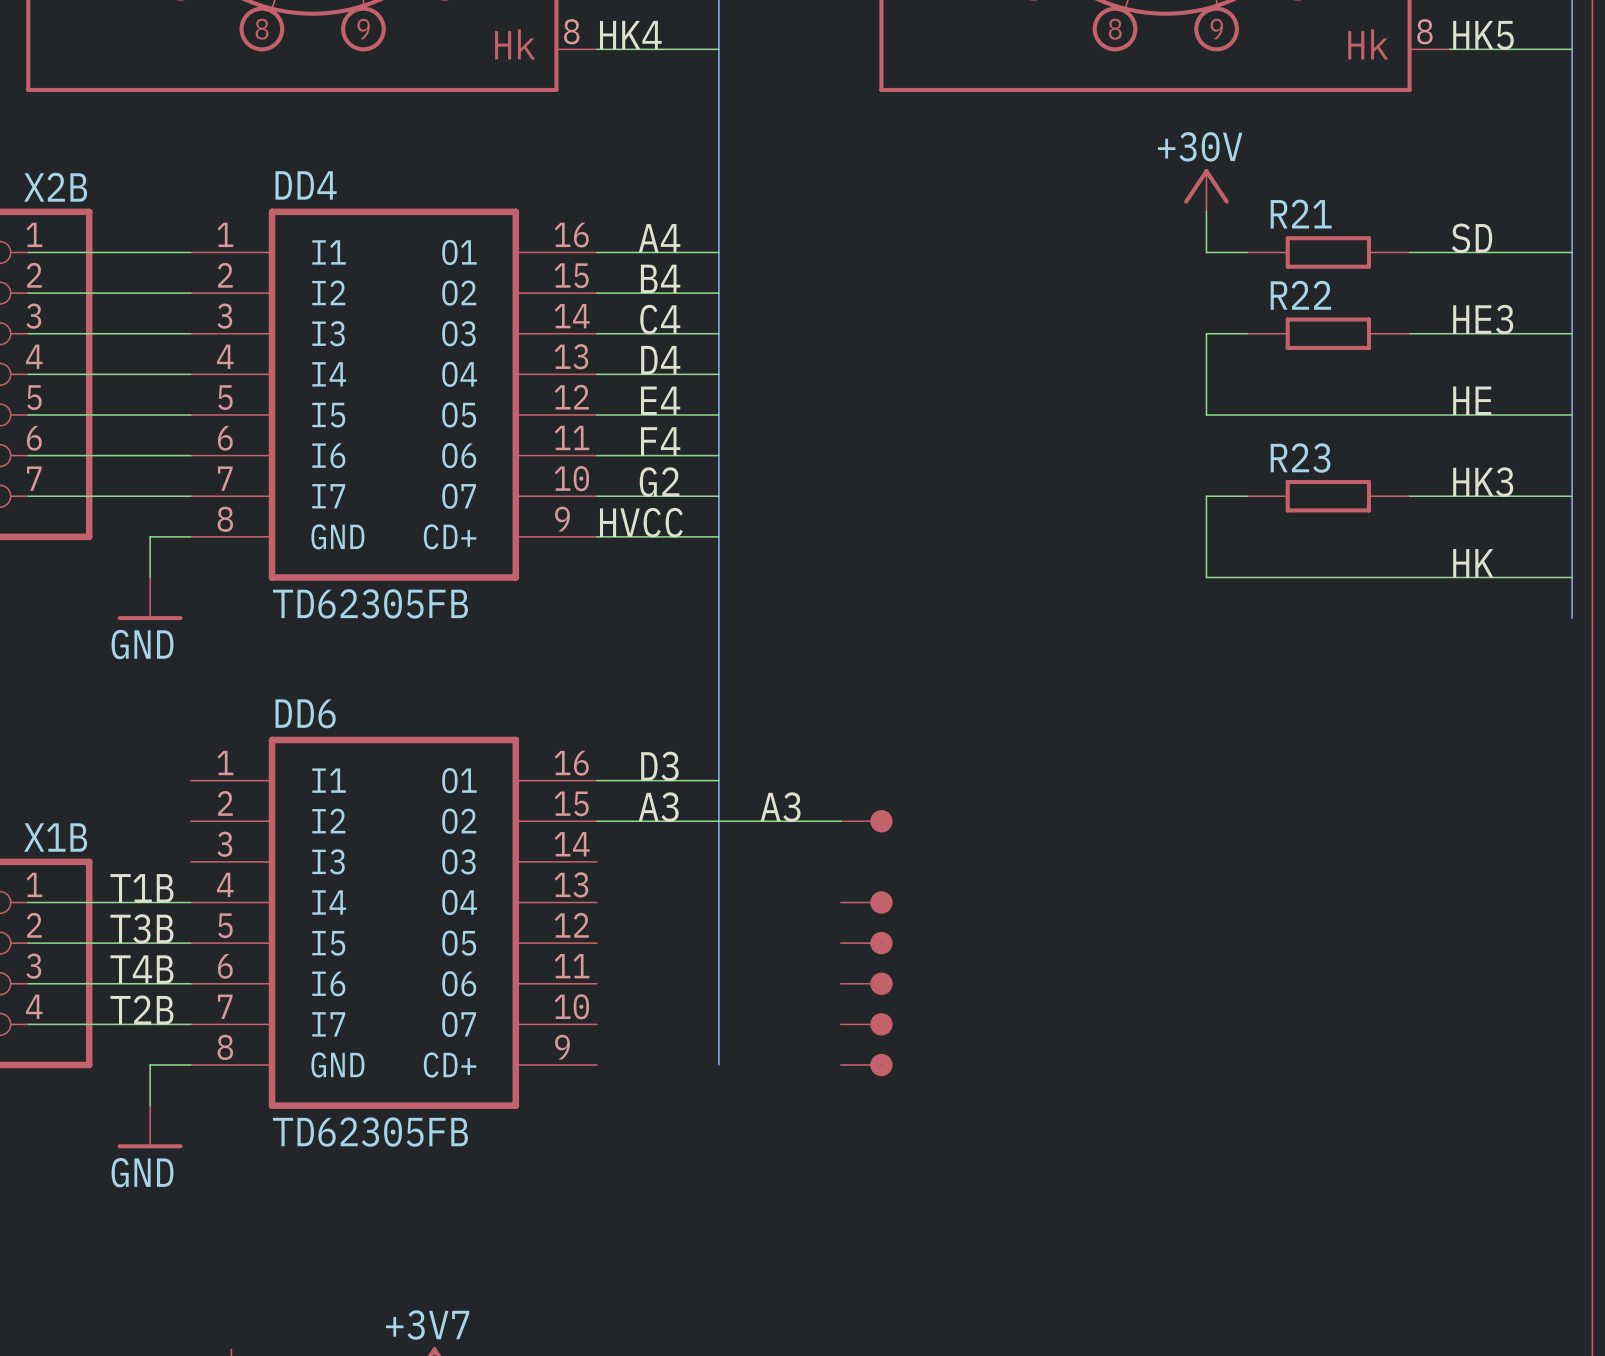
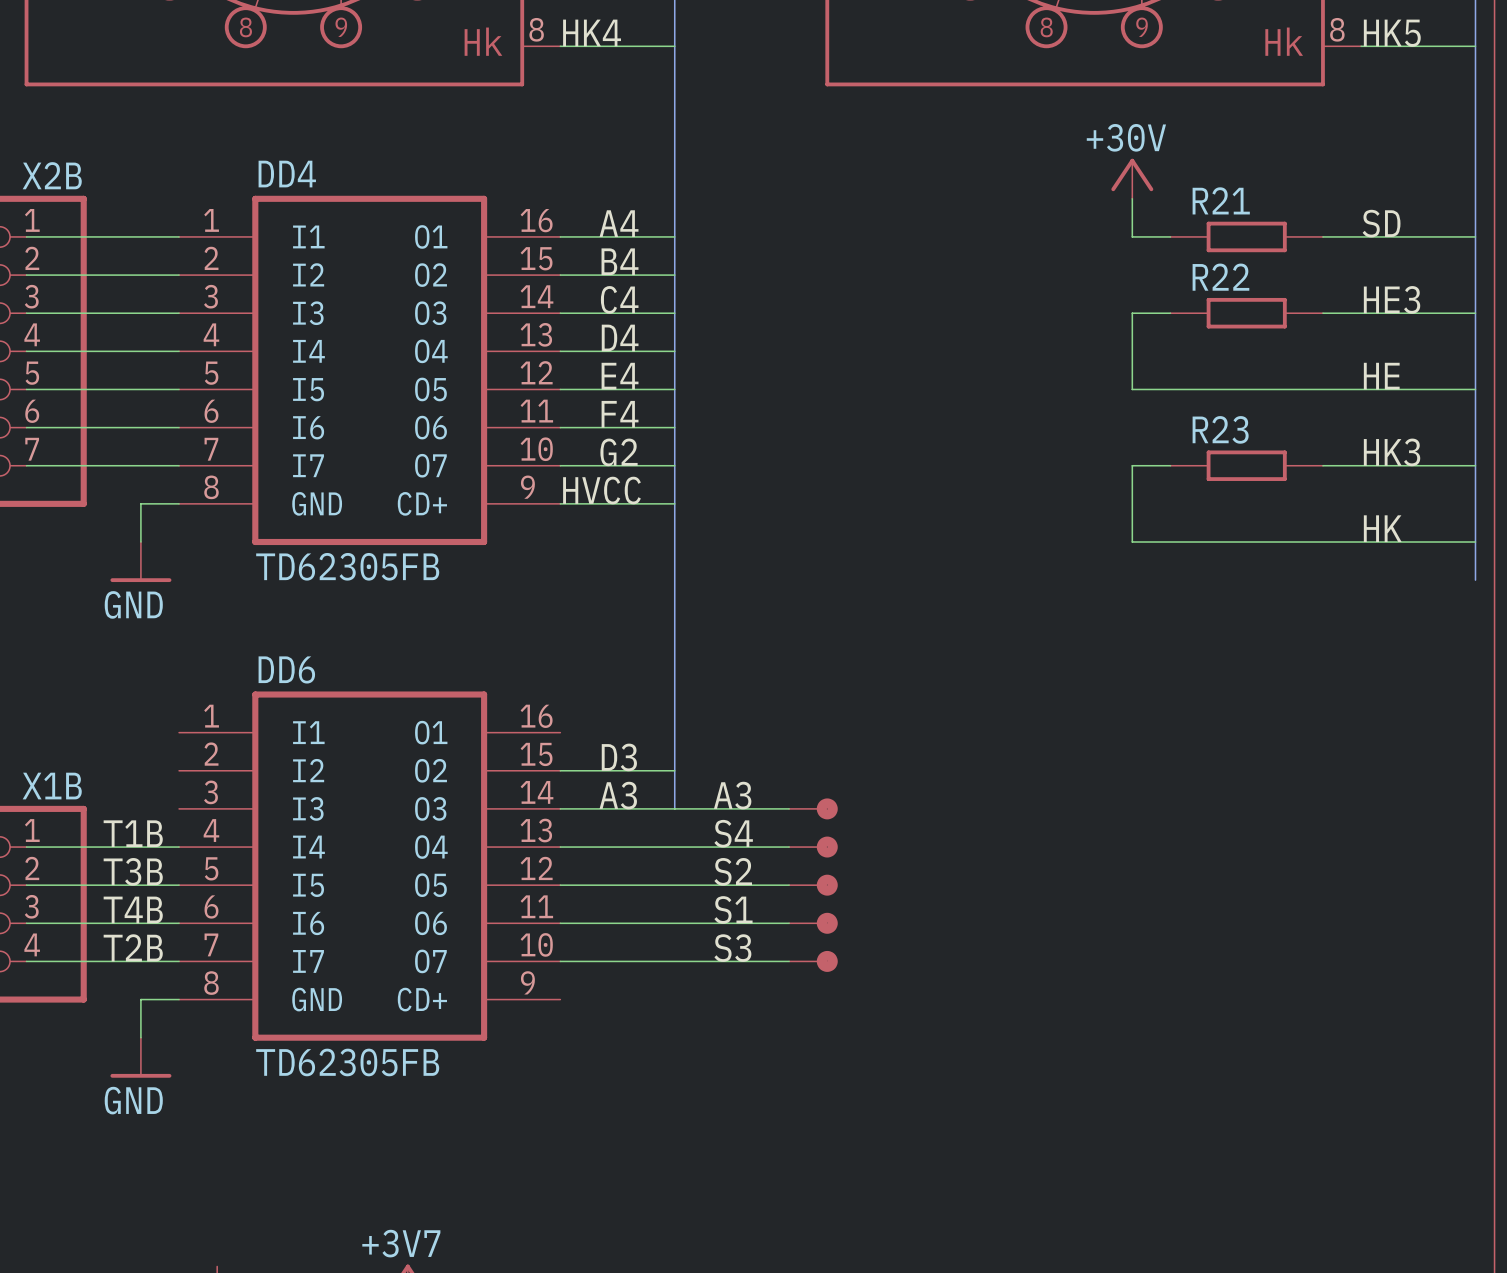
label: D3 (659, 766) -> none
wire: (597, 780) (718, 780) -> none
label: A3 (658, 807) -> D3 (619, 757)
label position: A3 (780, 807) -> A3 (732, 795)
wire: (718, 821) (840, 821) -> none
part position: (866, 821) -> (813, 808)
label: none -> A3 (618, 795)
wire: none -> (560, 808) (789, 808)
bus: (718, 861) (718, 1065) -> none
label: none -> S4 (733, 833)
wire: none -> (560, 847) (789, 847)
label: none -> S2 (733, 871)
wire: none -> (560, 885) (789, 885)
label: none -> S1 (733, 909)
wire: none -> (560, 923) (789, 923)
label: none -> S3 (732, 948)
wire: none -> (560, 961) (789, 961)
part: (866, 1065) -> none

